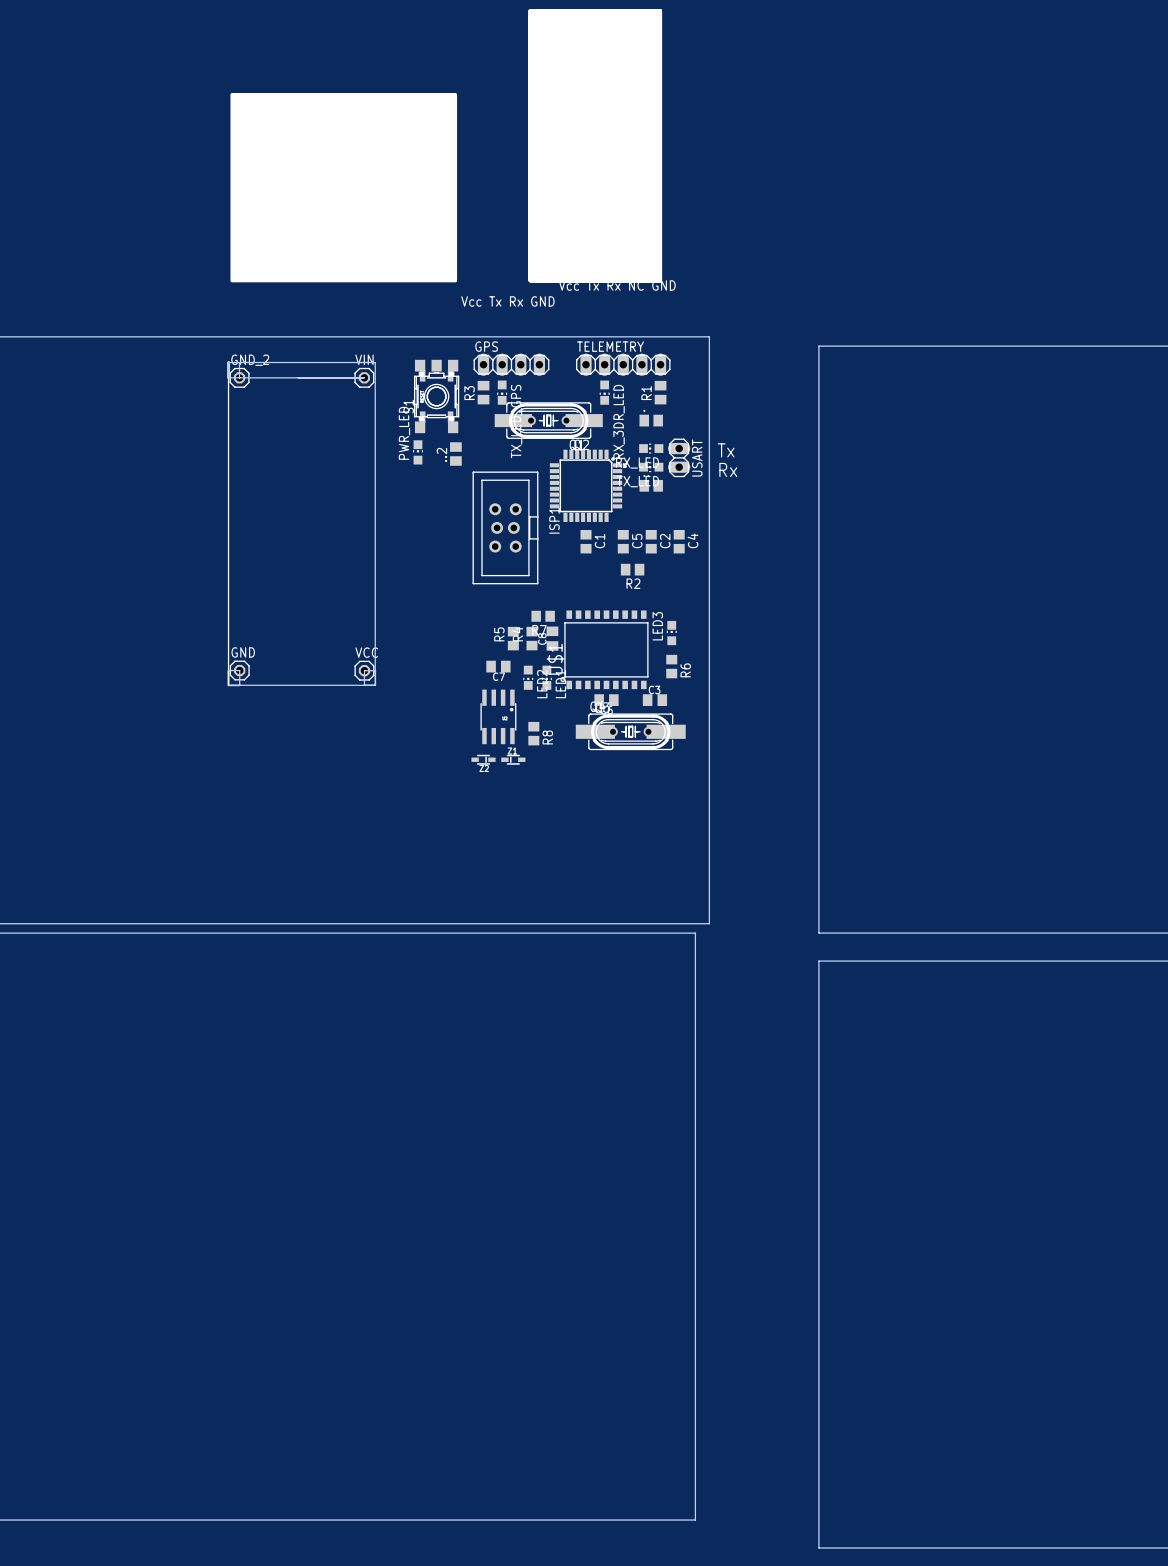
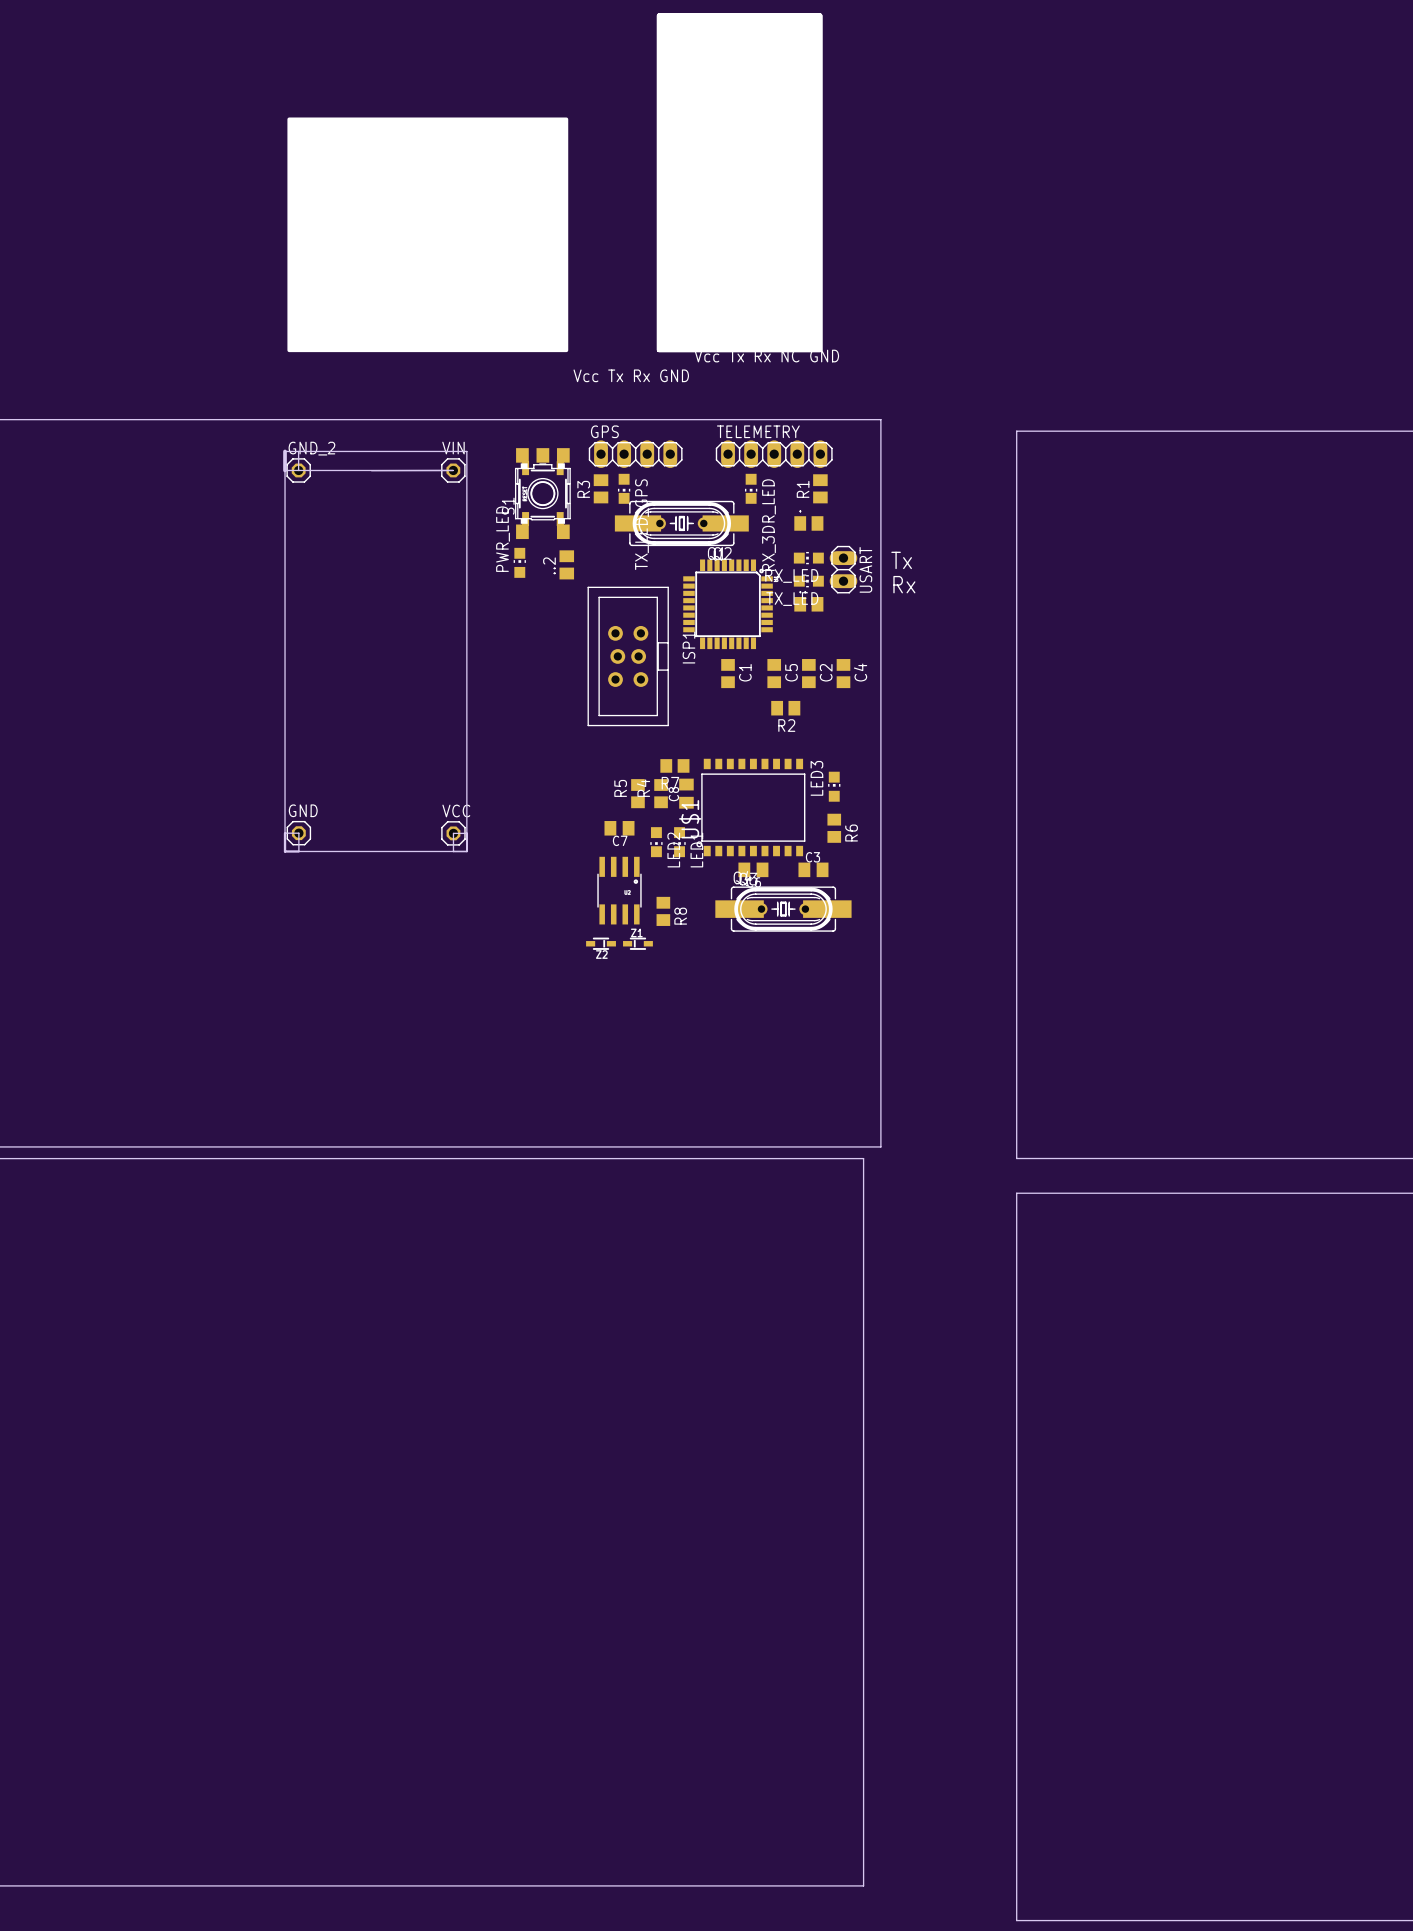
board edge: none -> (285, 470) (285, 851)
line: (228, 377) (228, 685) -> none

